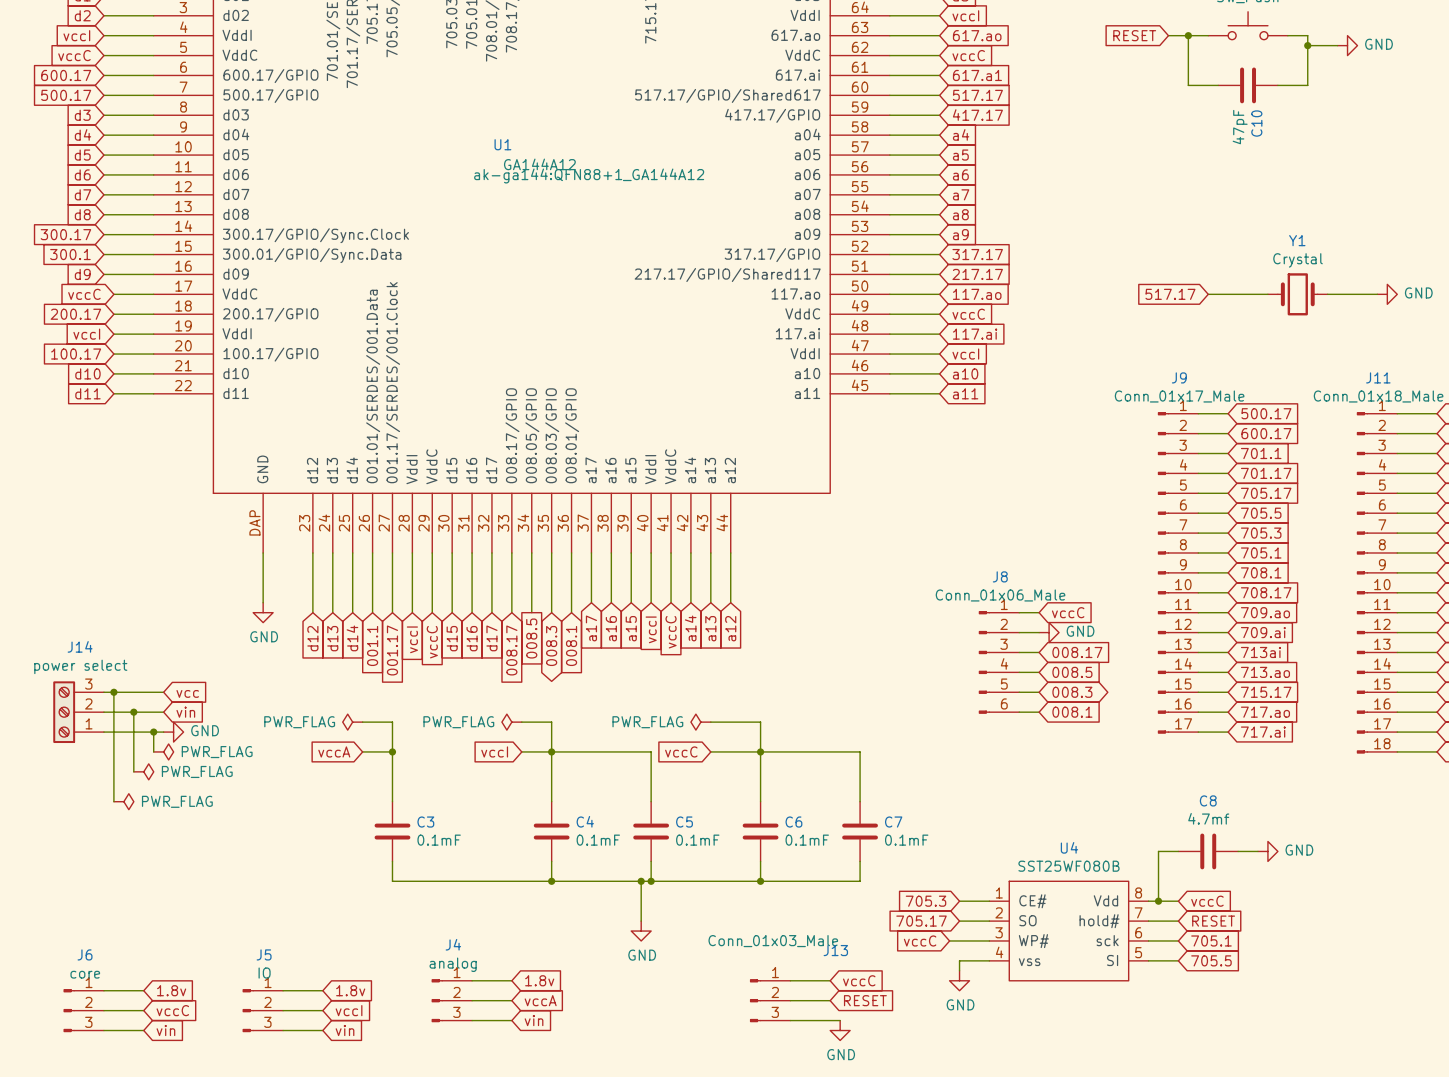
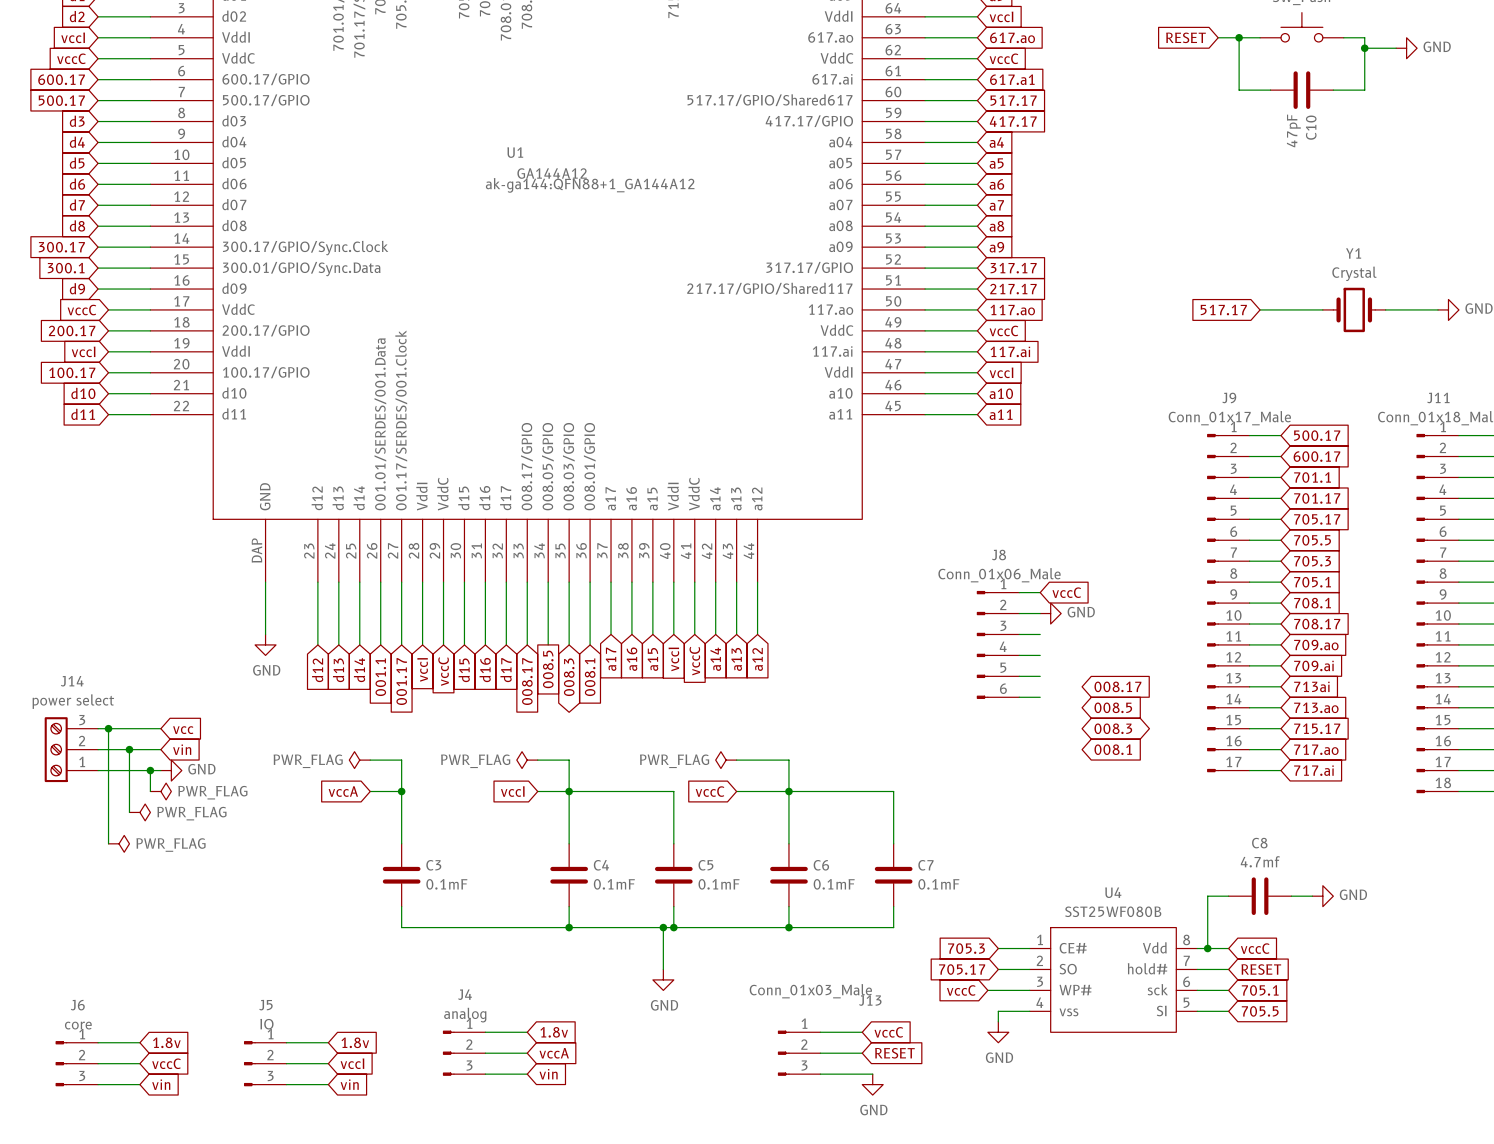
wire: (1019, 612) (1039, 612) -> (1019, 592) (1040, 592)
global label position: vccC (1068, 612) -> vccC (1066, 592)
wire: (1019, 632) (1039, 632) -> (1019, 613) (1040, 613)
power symbol position: GND (1049, 632) -> GND (1050, 613)
wire: (1019, 652) (1039, 652) -> (1019, 634) (1040, 634)
J8 position: (999, 662) -> (998, 644)
wire: (1019, 672) (1039, 672) -> (1019, 655) (1040, 655)
wire: (1019, 692) (1039, 692) -> (1019, 676) (1040, 676)
wire: (1019, 712) (1039, 712) -> (1019, 697) (1040, 697)

